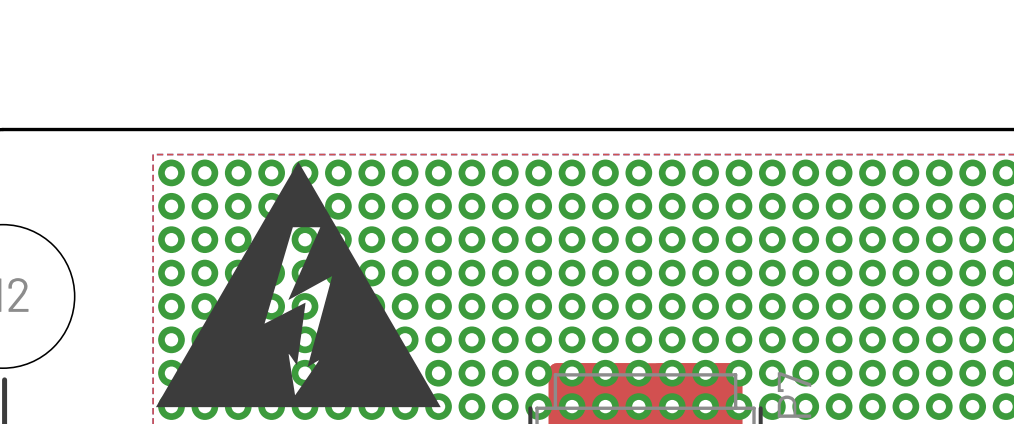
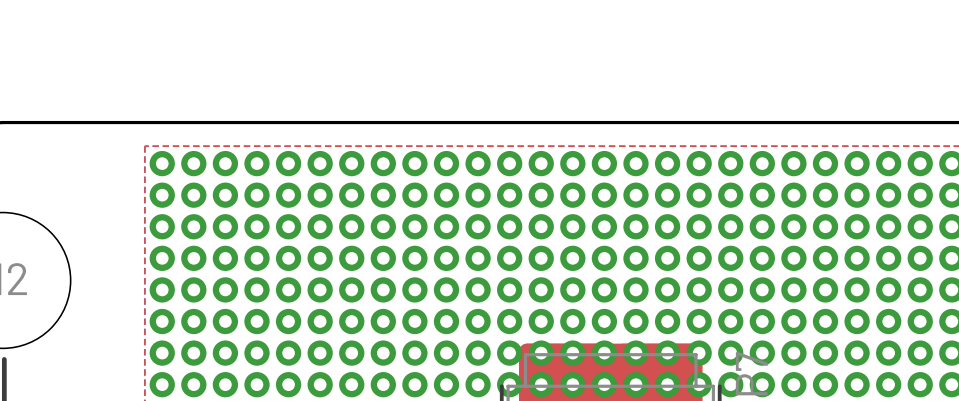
drawing: [155, 161, 441, 408] -> none

